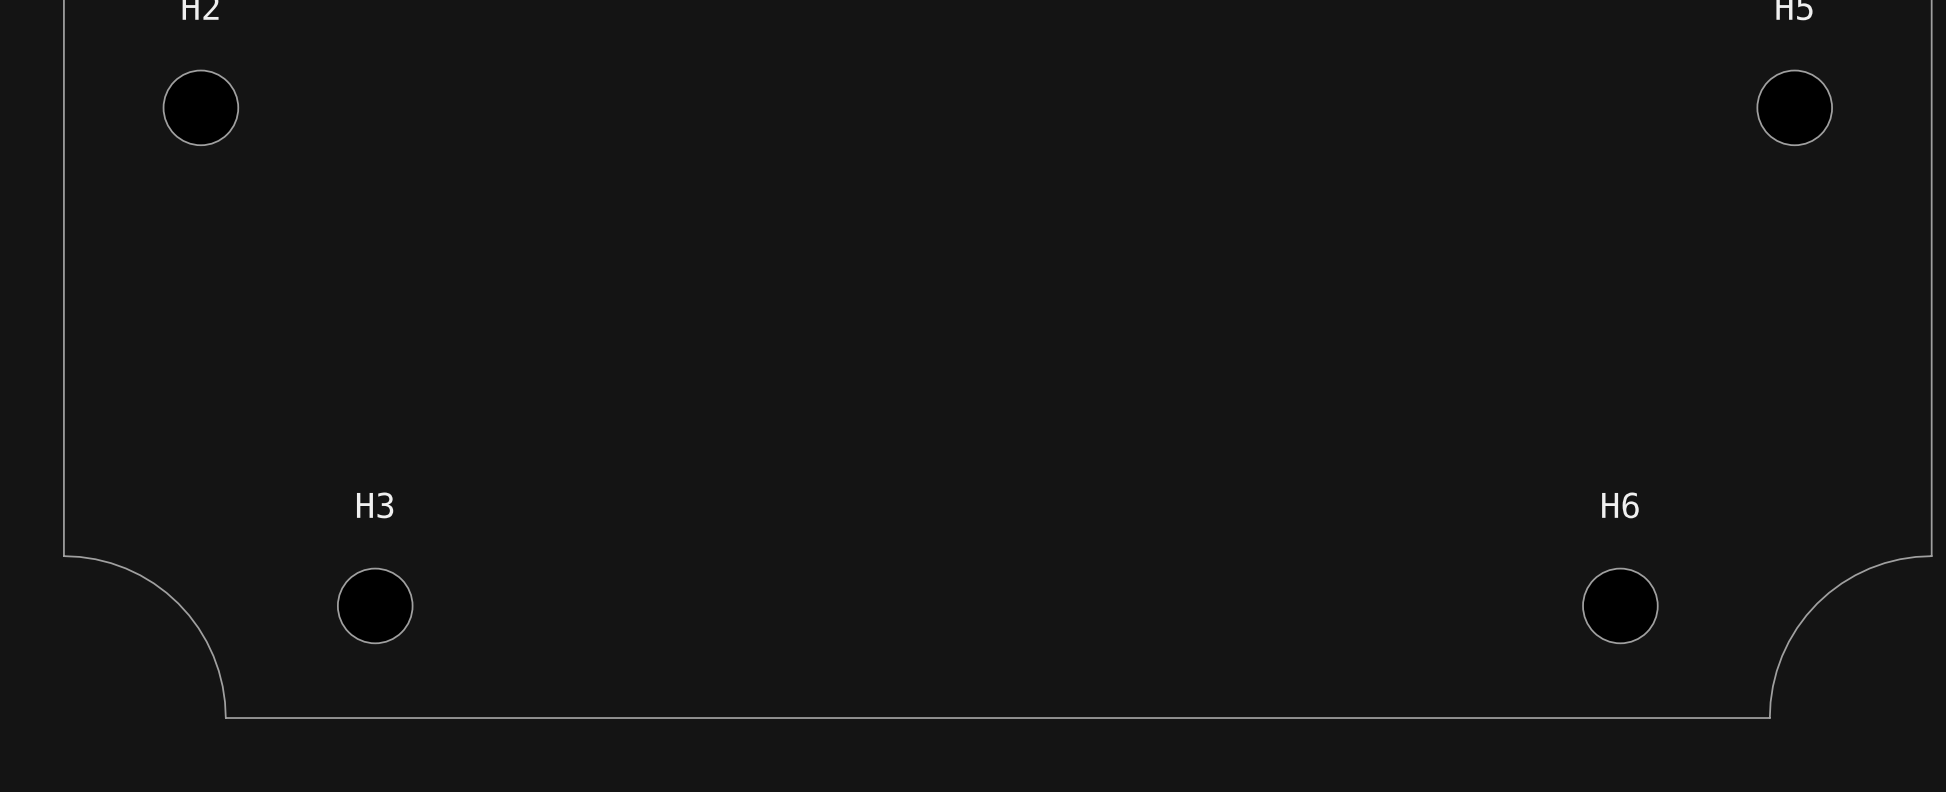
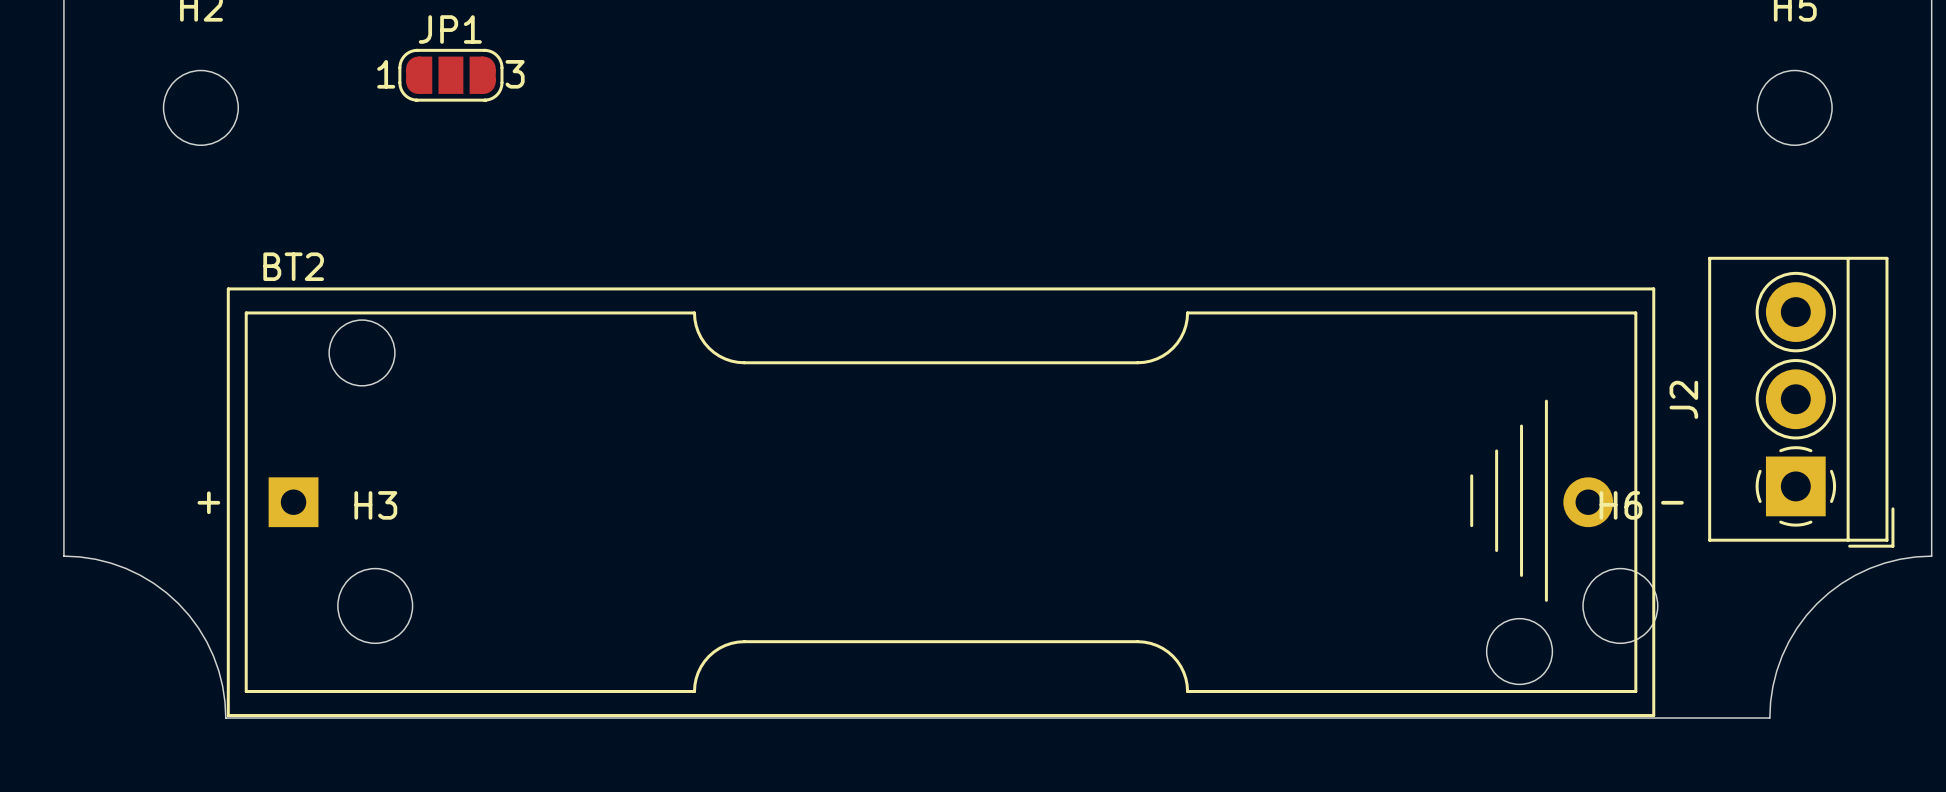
JP1: none -> (450, 75)
J2: none -> (1801, 402)
BT2: none -> (941, 502)

